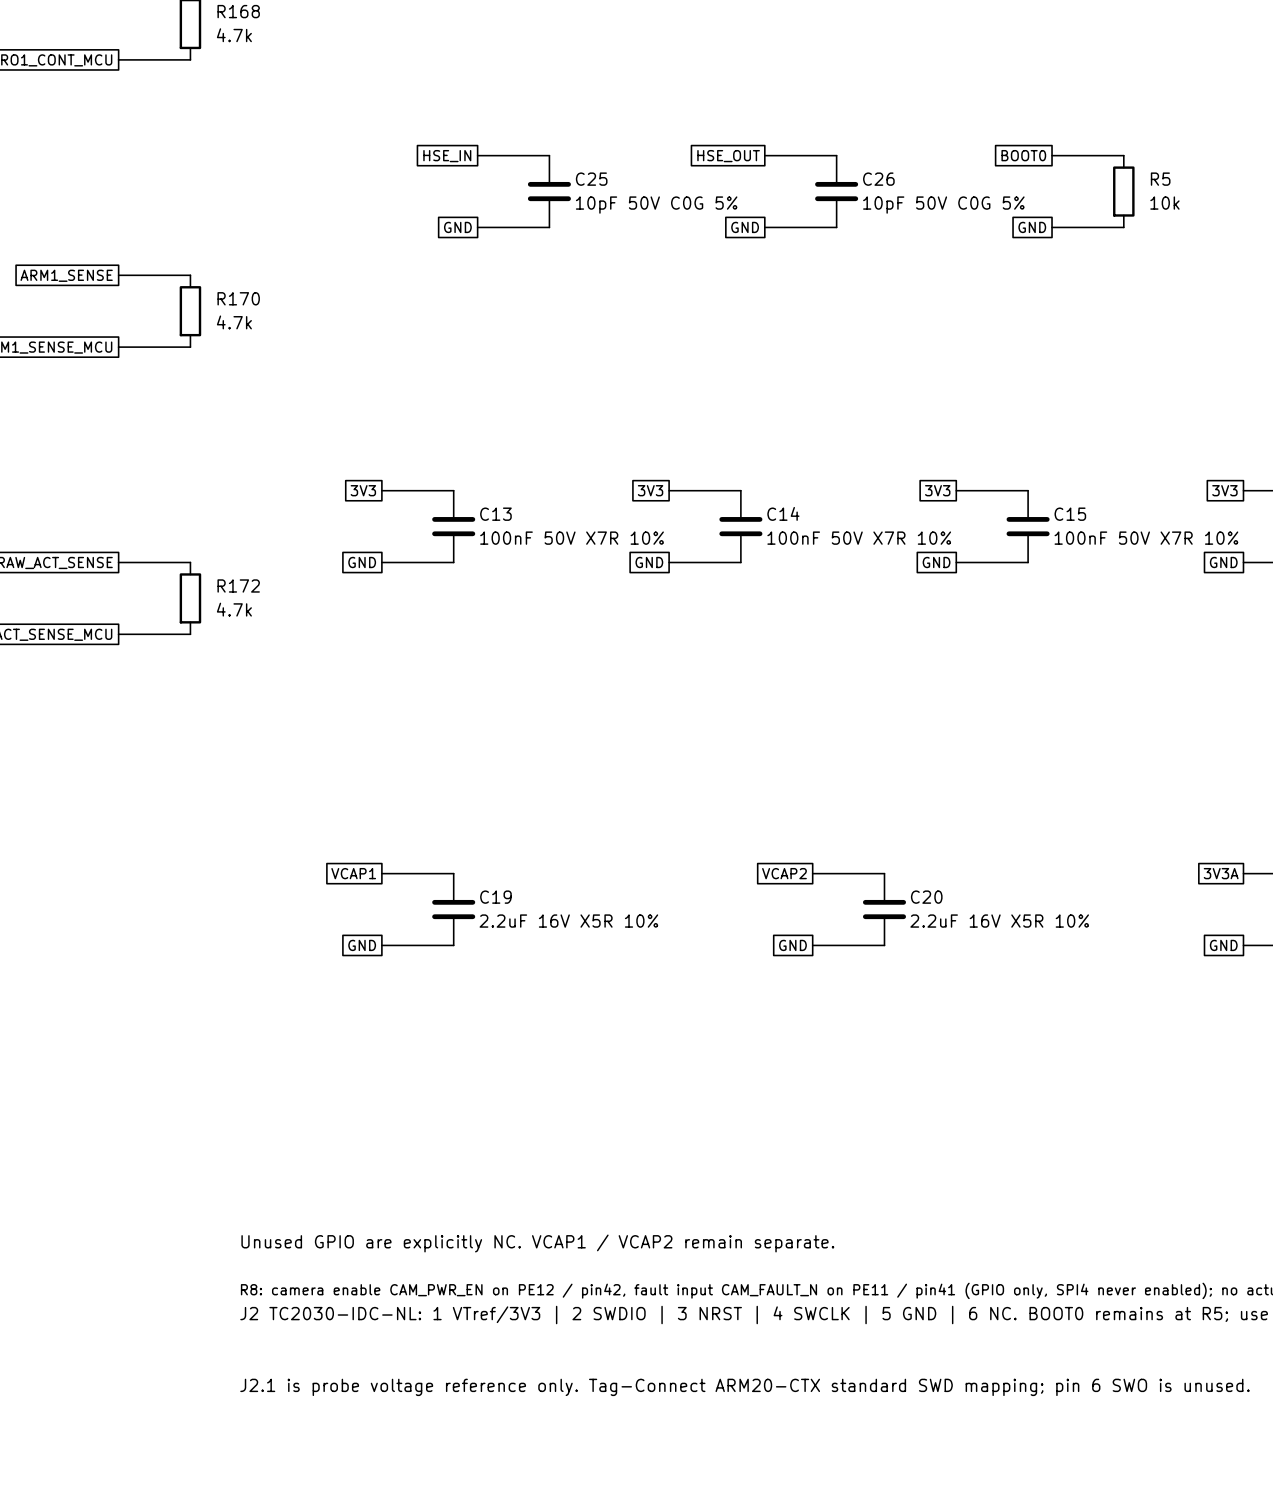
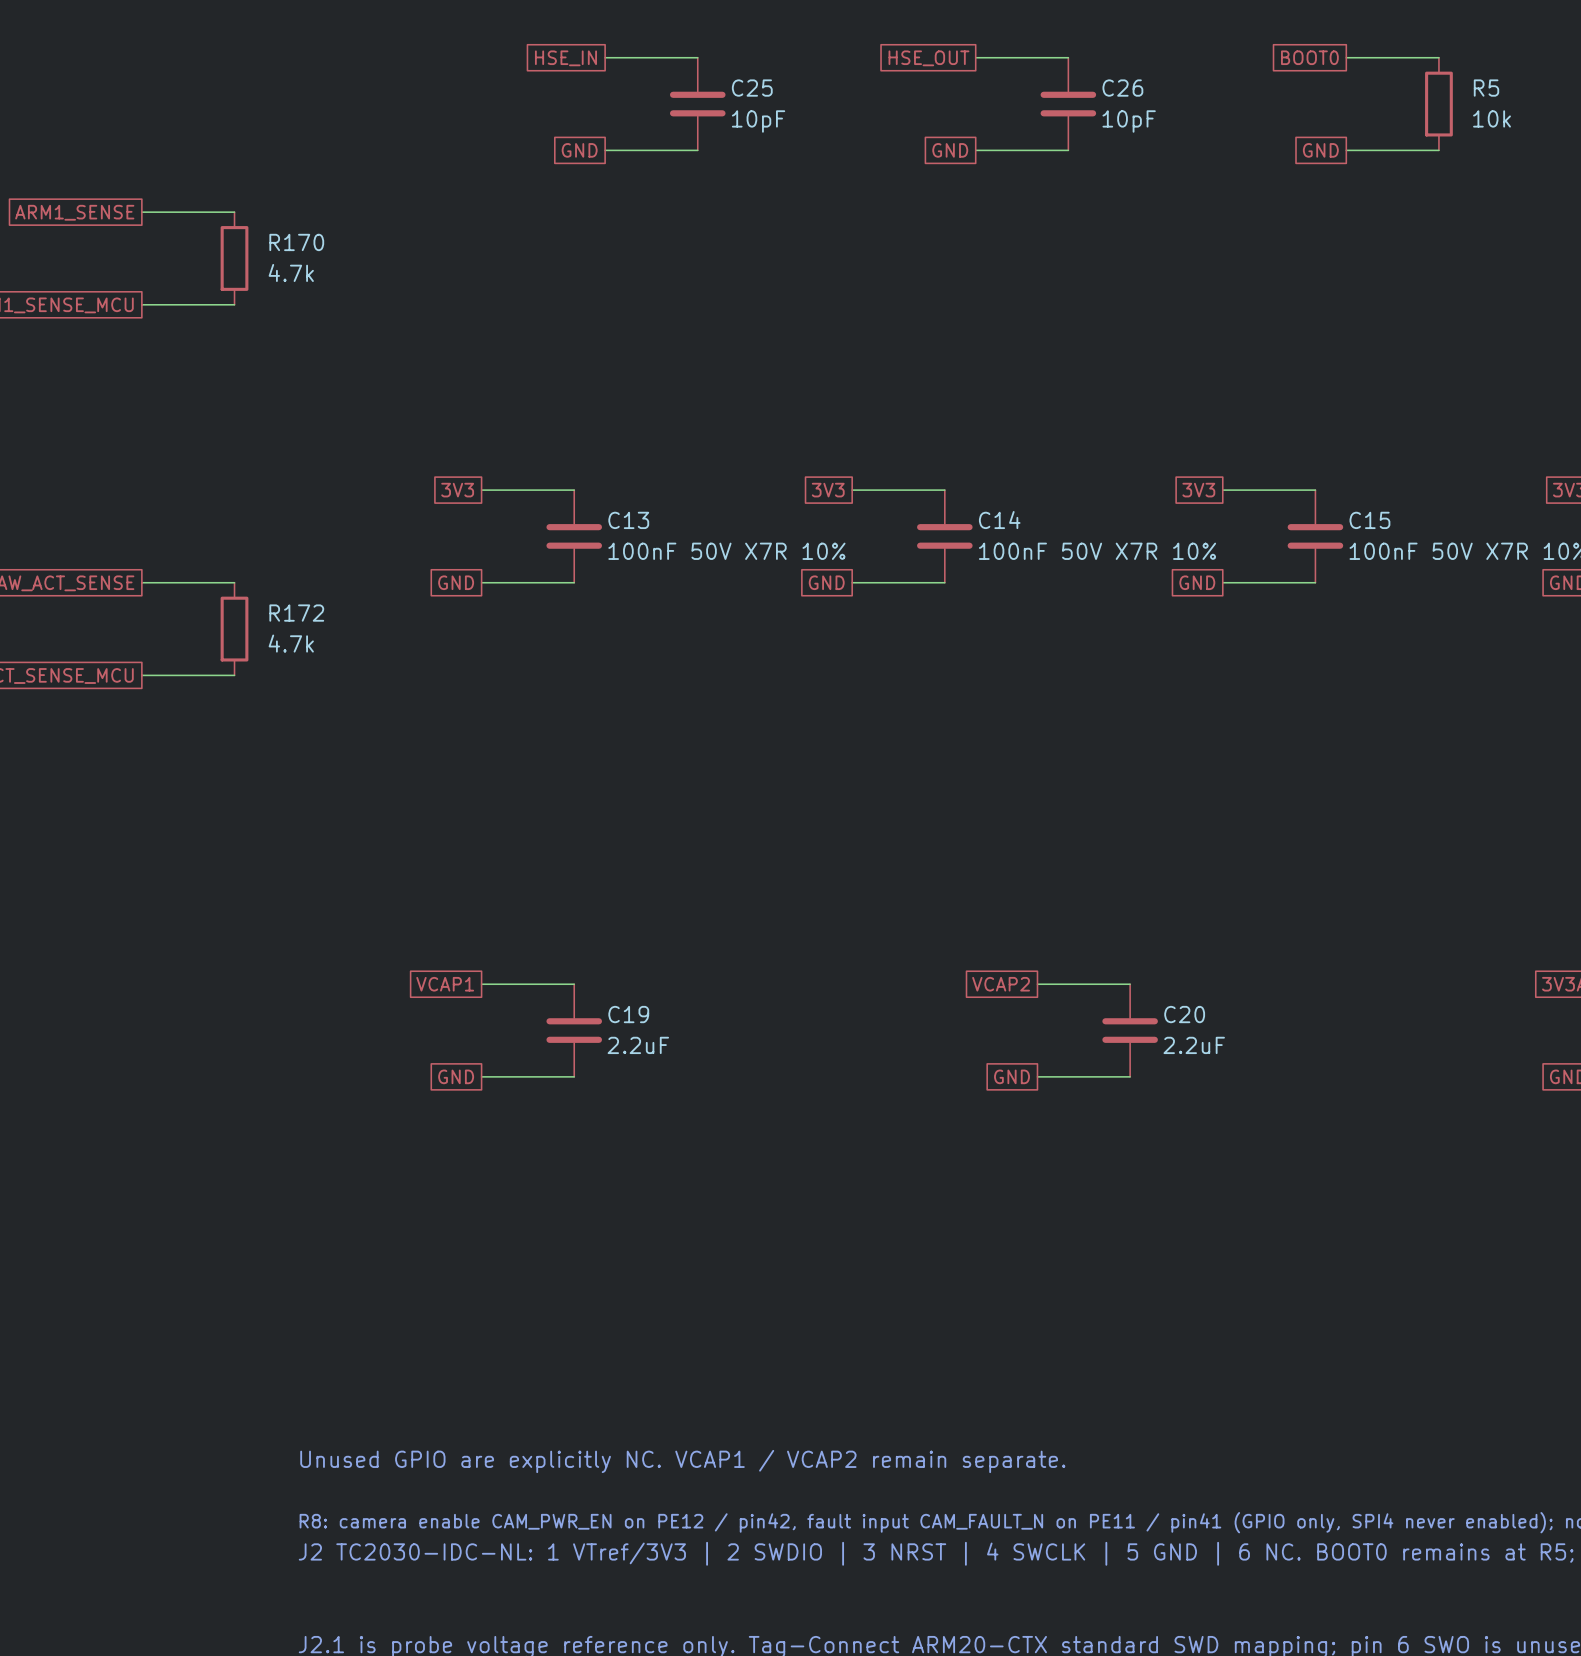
C25 value: 10pF 50V C0G 5% (656, 205) -> 10pF (758, 121)
C26 value: 10pF 50V C0G 5% (943, 205) -> 10pF (1129, 121)
C19 value: 2.2uF 16V X5R 10% (568, 921) -> 2.2uF (638, 1045)
C20 value: 2.2uF 16V X5R 10% (999, 921) -> 2.2uF (1194, 1045)

